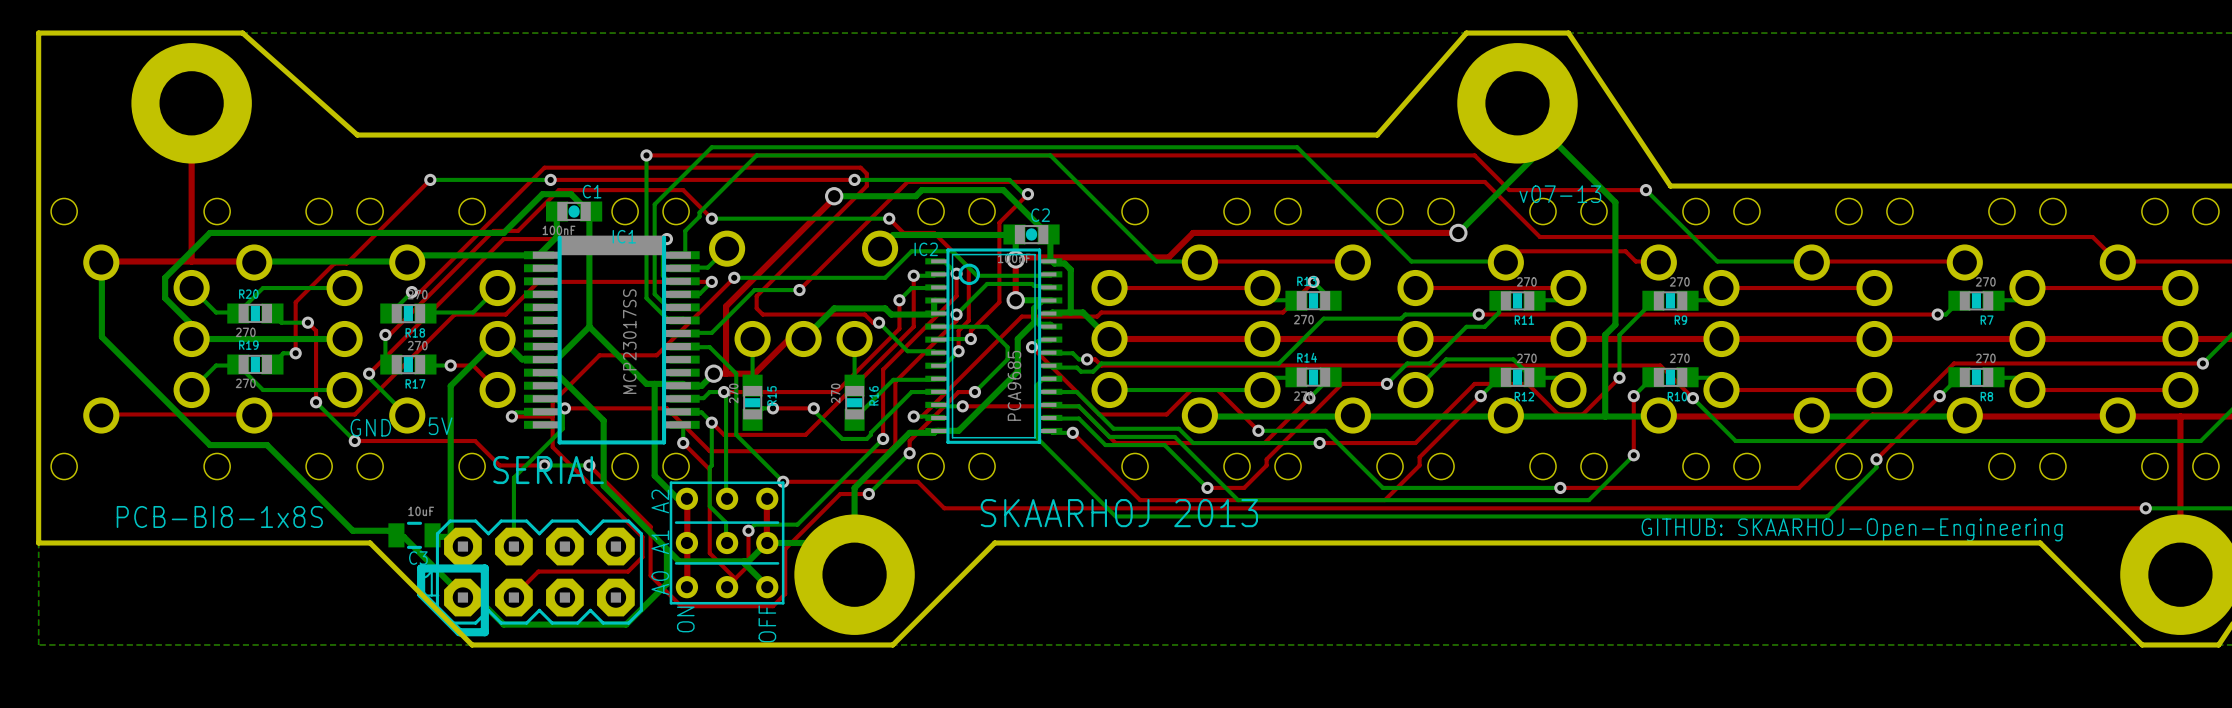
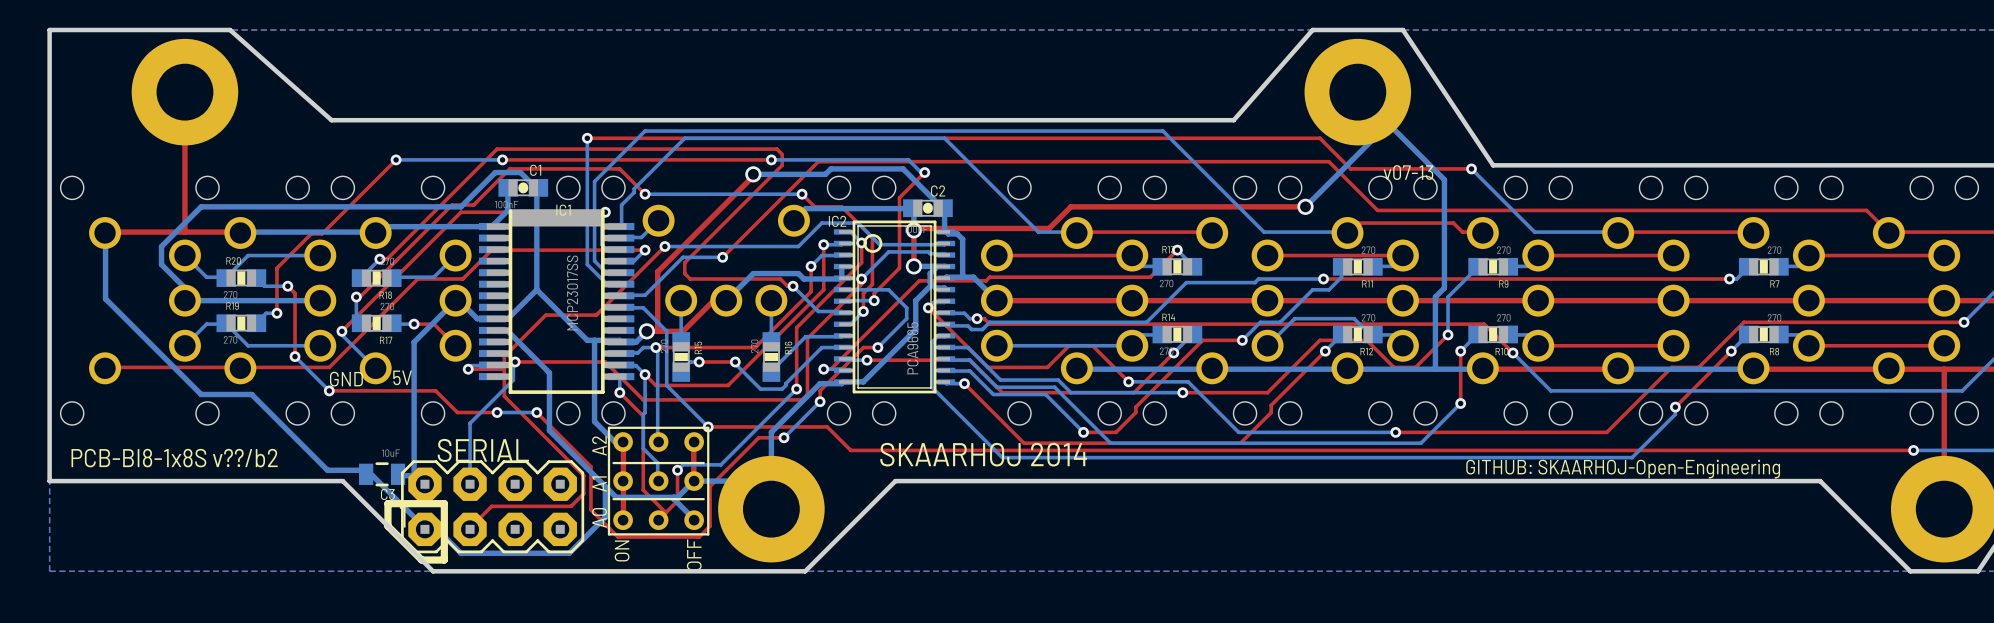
SERIAL name position: SERIAL (548, 470) -> SERIAL (483, 450)
text: SKAARHOJ 2013 (1119, 513) -> SKAARHOJ 2014 (983, 454)
text: PCB-BI8-1x8S (219, 516) -> PCB-BI8-1x8S v??/b2 (174, 458)

